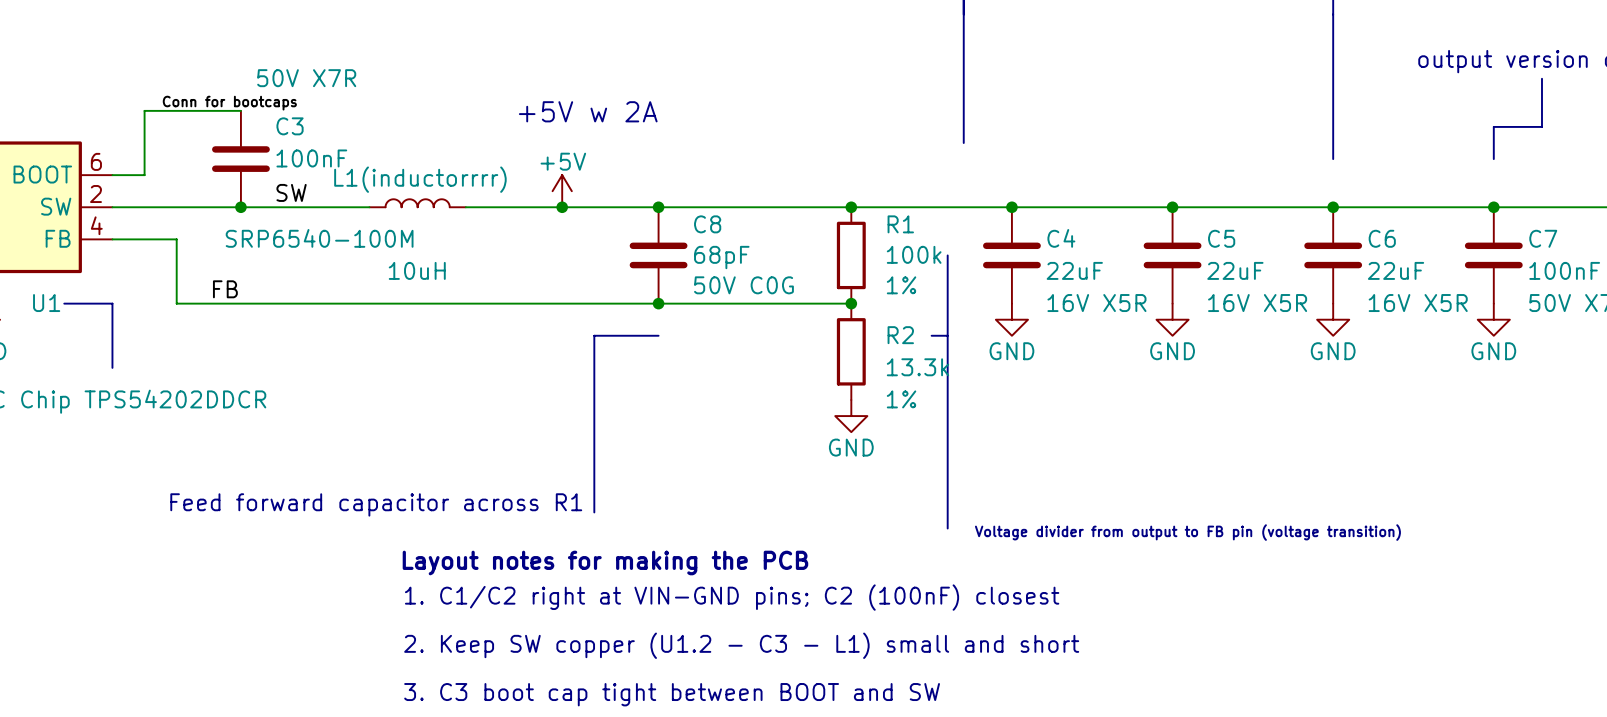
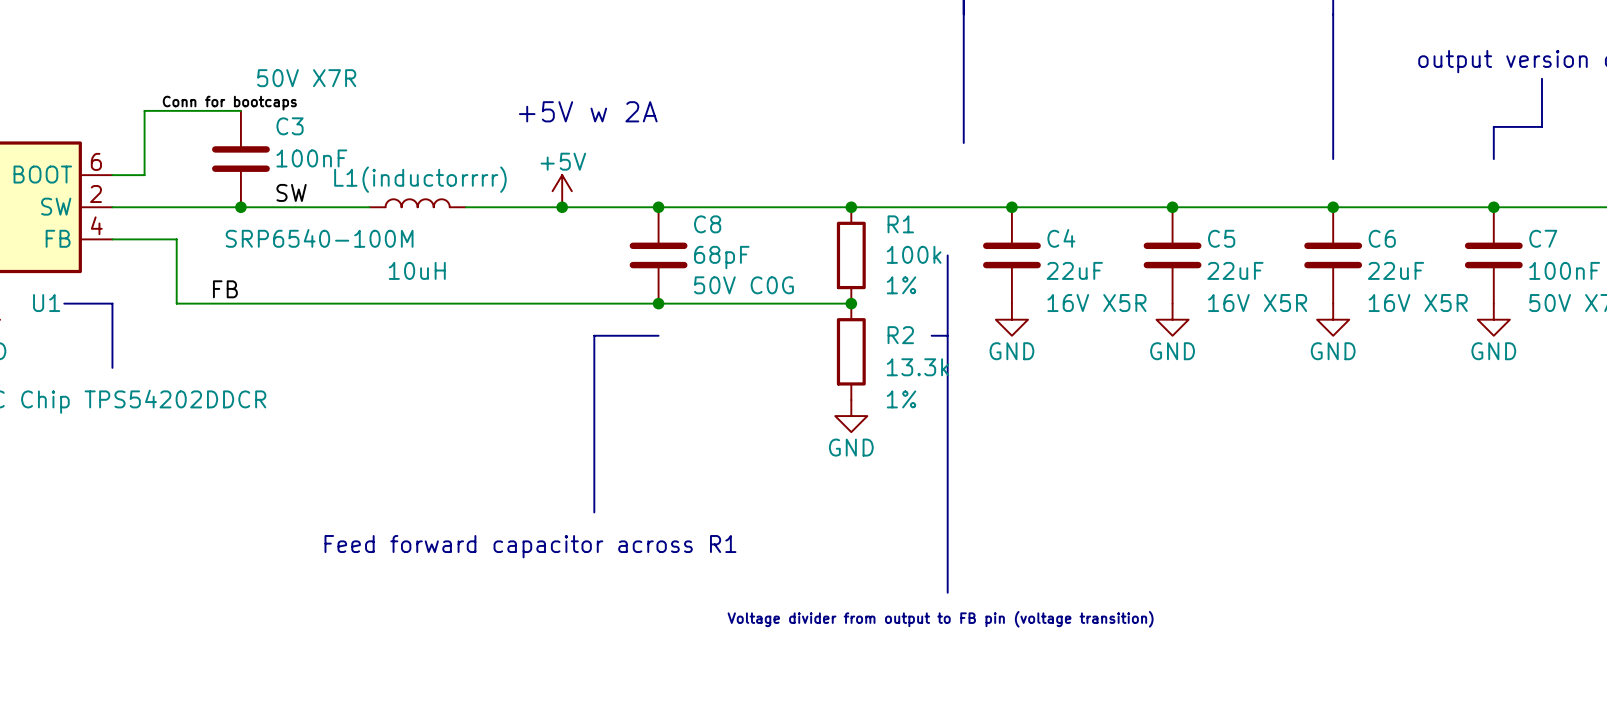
text position: Feed forward capacitor across R1 (376, 504) -> Feed forward capacitor across R1 (530, 546)
line: none -> (947, 528) (947, 592)
text position: Voltage divider from output to FB pin (voltage transition) (1187, 532) -> Voltage divider from output to FB pin (voltage transition) (940, 619)
text: Layout notes for making the PCB (605, 563) -> none
text: 1. C1/C2 right at VIN-GND pins; C2 (100nF) closest (732, 597) -> none
text: 2. Keep SW copper (U1.2 - C3 - L1) small and short (741, 645) -> none
text: 3. C3 boot cap tight between BOOT and SW (672, 694) -> none

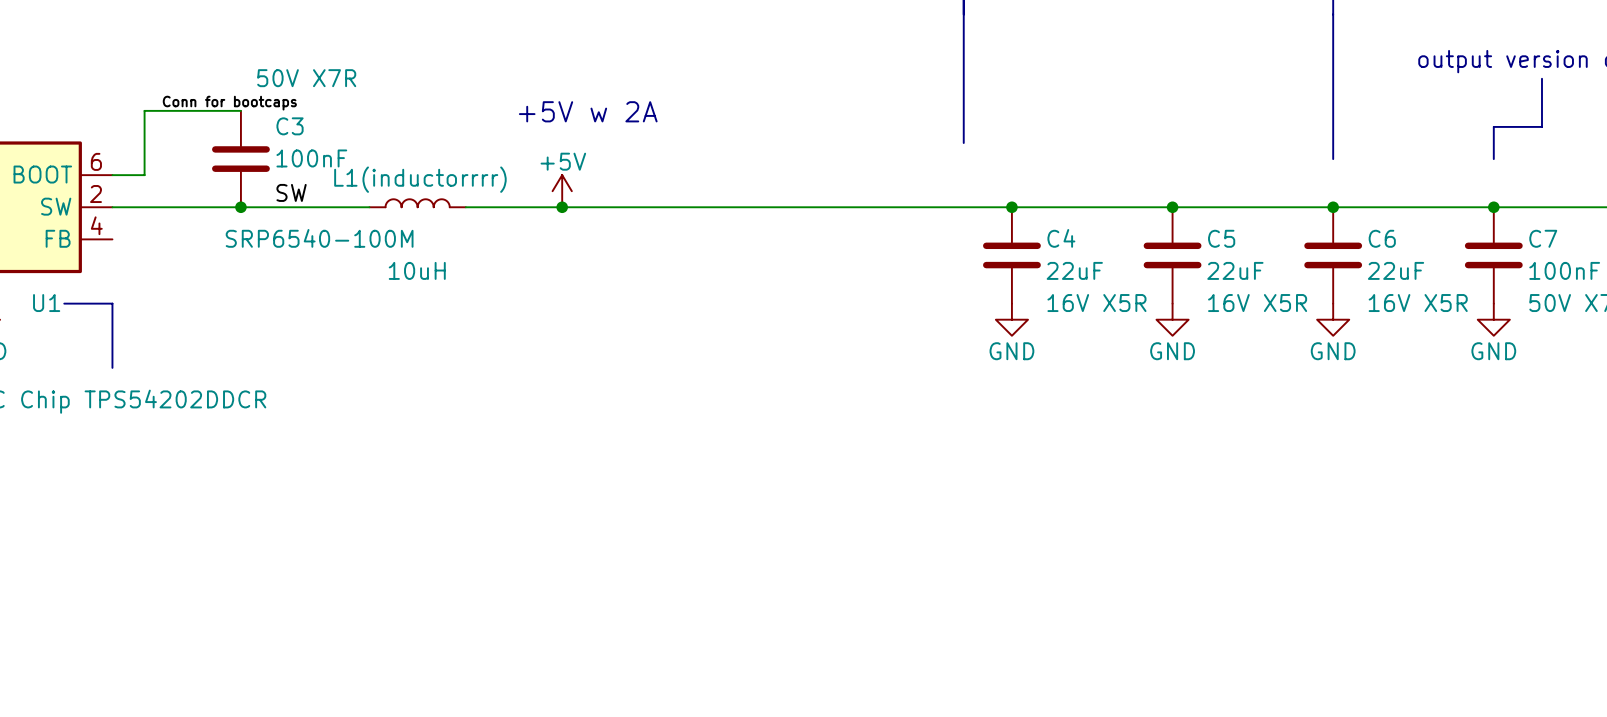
junction: (658, 207) -> none
junction: (851, 207) -> none
wire: (112, 239) (176, 239) (176, 303) (851, 303) -> none
C8: 68pF (658, 255) -> none
R1: 100k (851, 255) -> none
line: (947, 255) (947, 592) -> none
label: FB (225, 289) -> none
junction: (658, 303) -> none
junction: (851, 303) -> none
line: (658, 335) (594, 335) (594, 512) -> none
line: (931, 335) (947, 335) -> none
R2: 13.3k (851, 351) -> none
power symbol: GND (851, 416) -> none
text: Feed forward capacitor across R1 (530, 546) -> none
text: Voltage divider from output to FB pin (voltage transition) (940, 619) -> none

